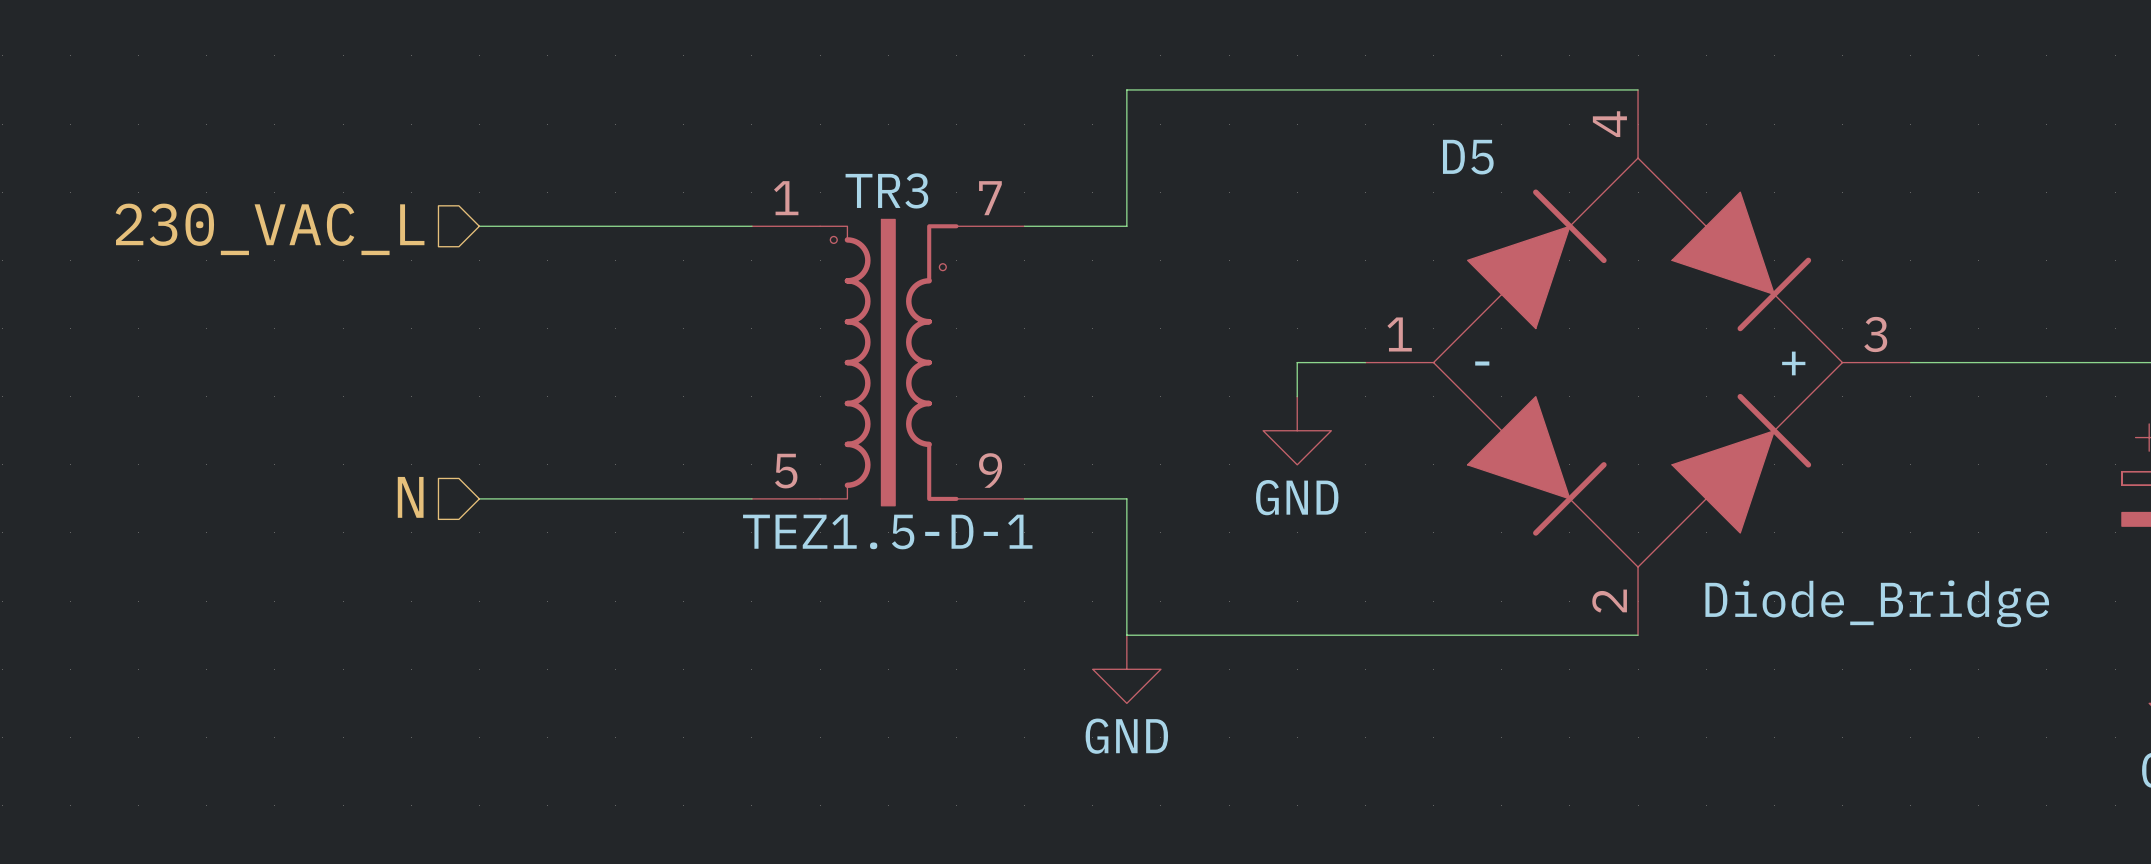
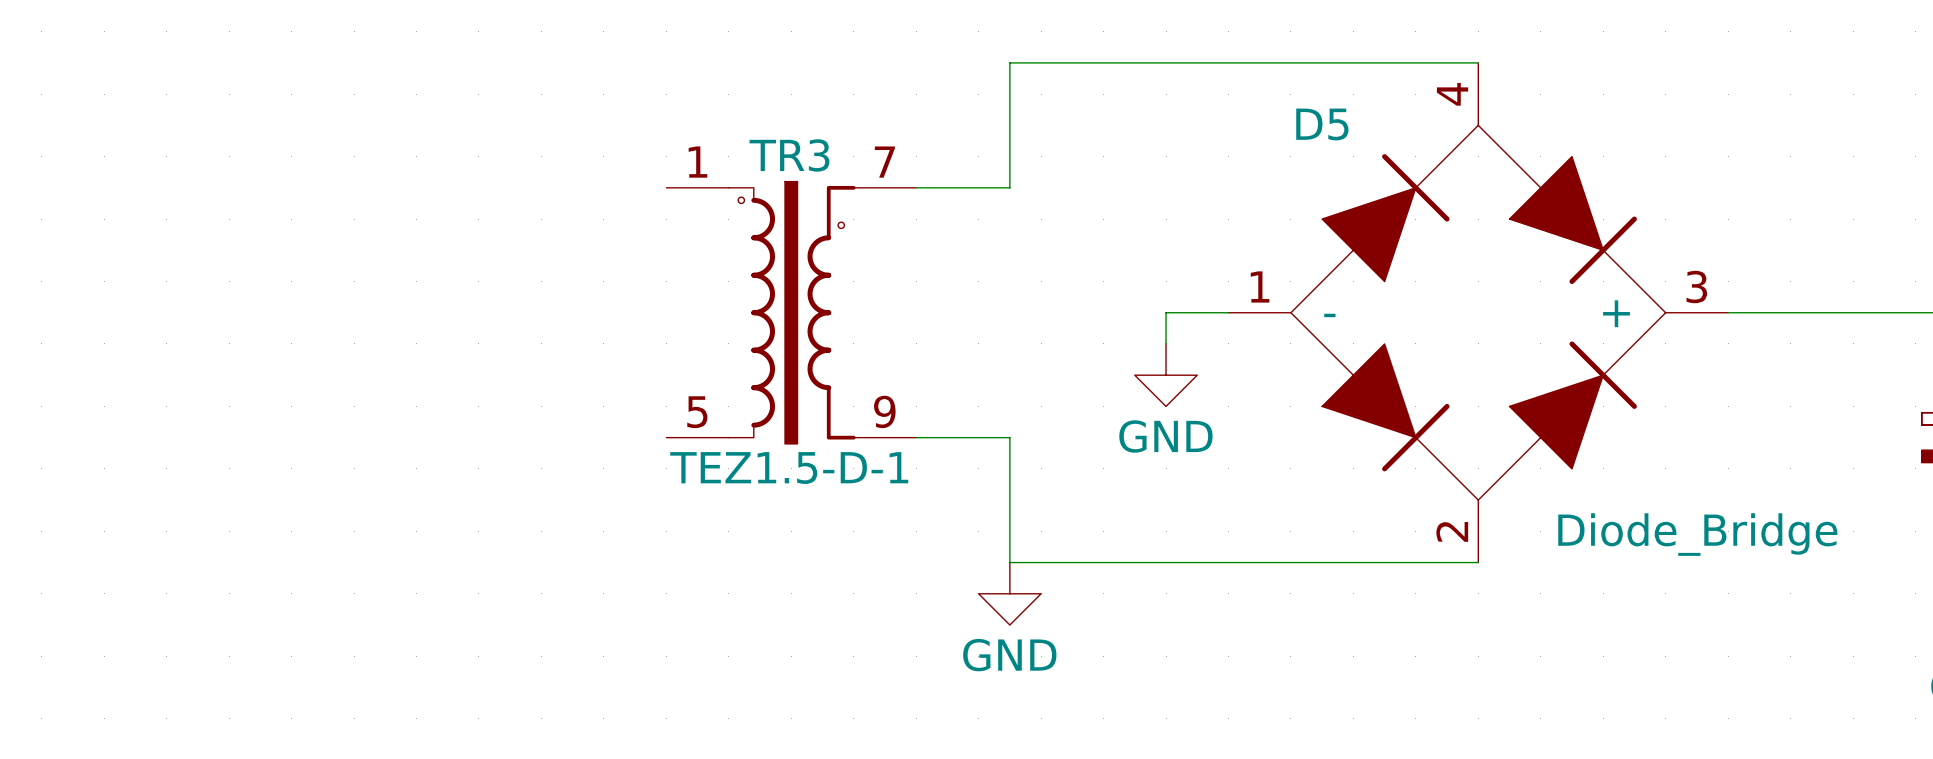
wire: (479, 226) (751, 226) -> none
hierarchical label: 230_VAC_L (270, 229) -> none
hierarchical label: N (410, 497) -> none
wire: (479, 498) (751, 498) -> none

